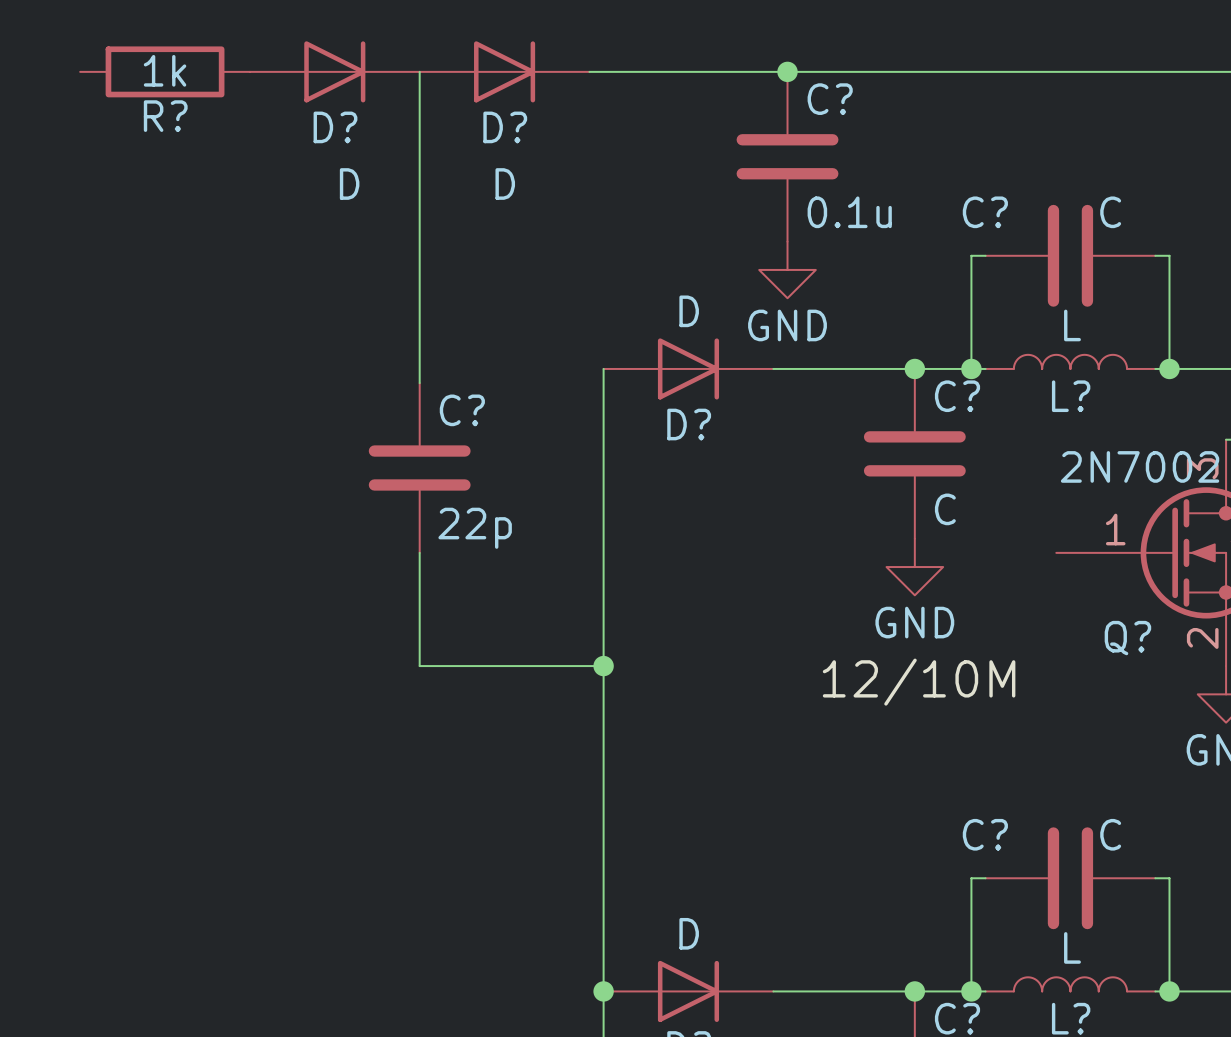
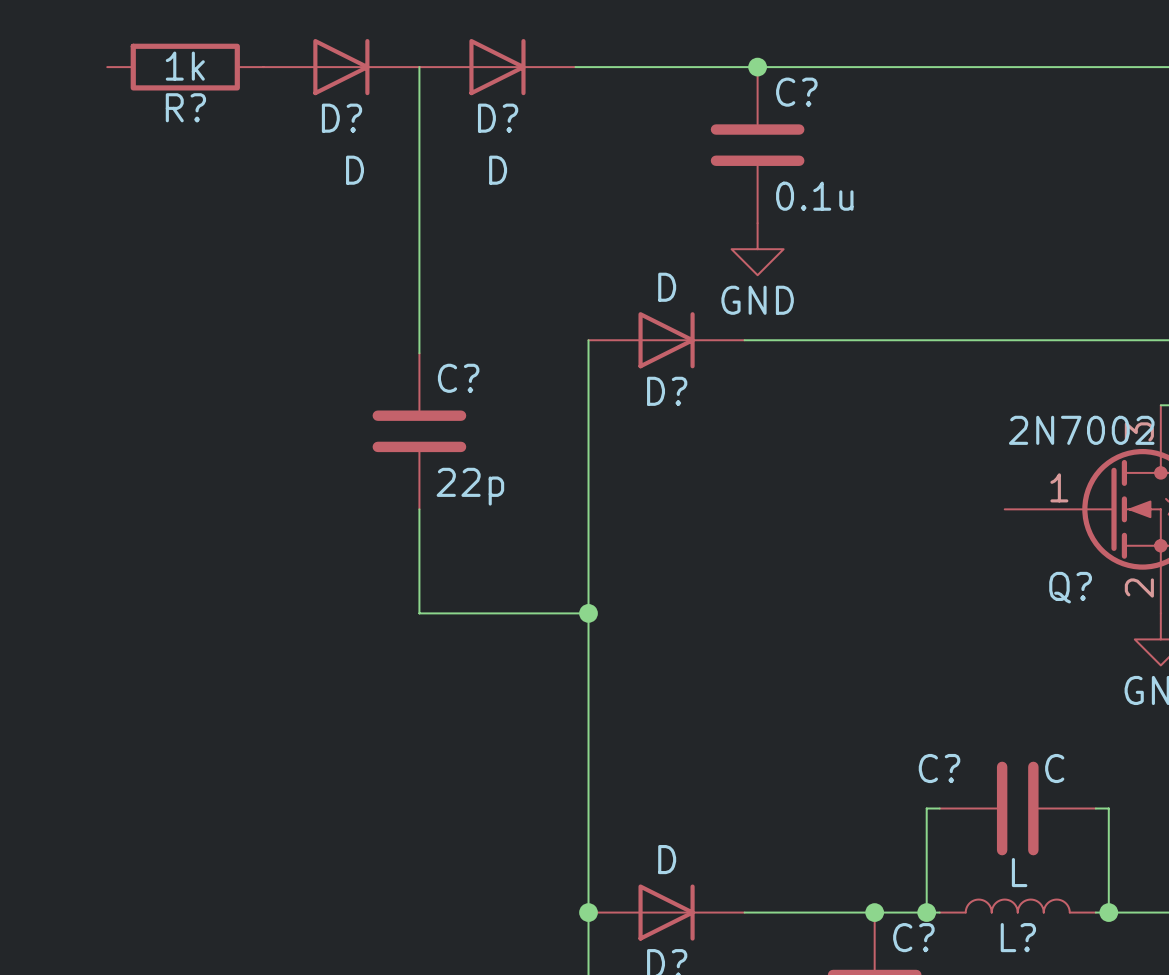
wire: (985, 255) (971, 255) (971, 368) -> none
C?: C (1070, 255) -> none
wire: (1155, 255) (1169, 255) (1169, 368) -> none
L?: L (1070, 361) -> none
junction: (914, 368) -> none
junction: (971, 368) -> none
wire: none -> (939, 340) (1095, 340)
junction: (1169, 368) -> none
C?: C (914, 453) -> none
power symbol: GND (914, 567) -> none
label: 12/10M (919, 682) -> none

